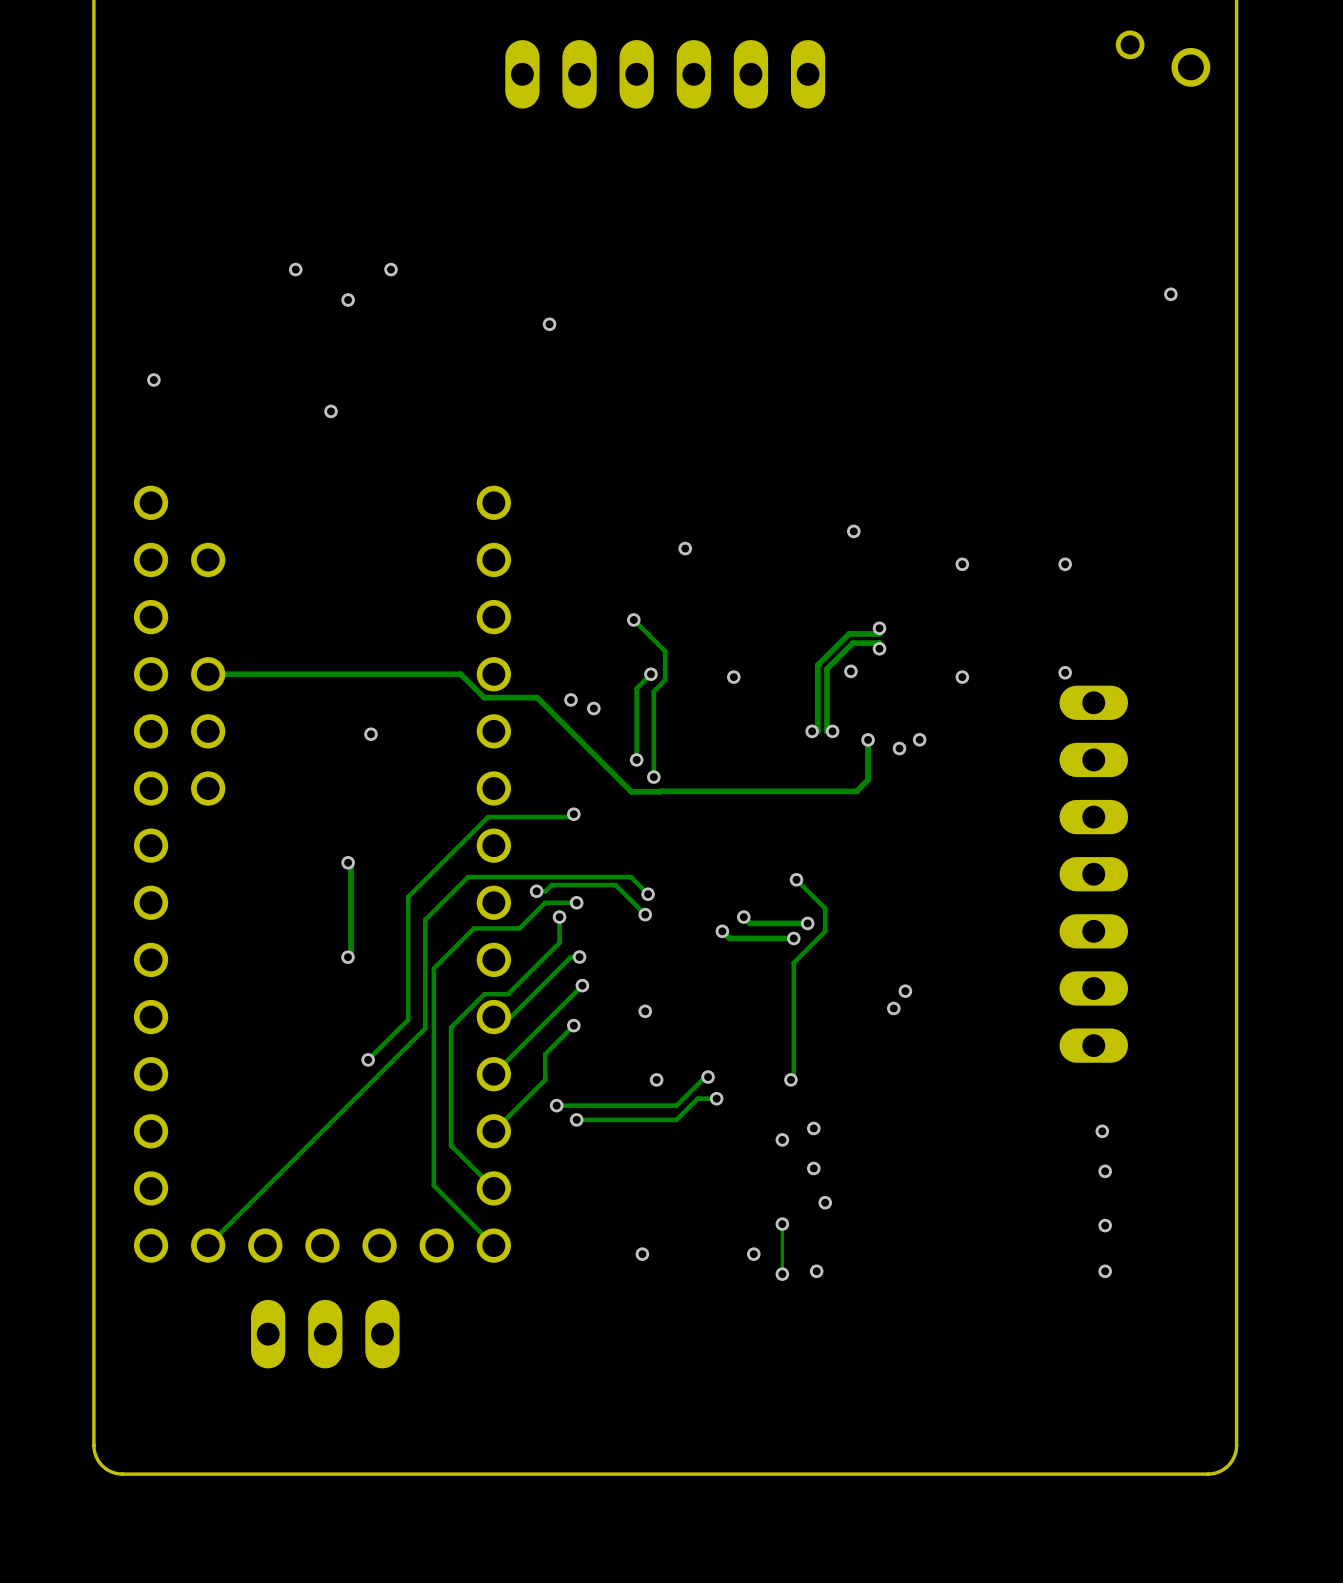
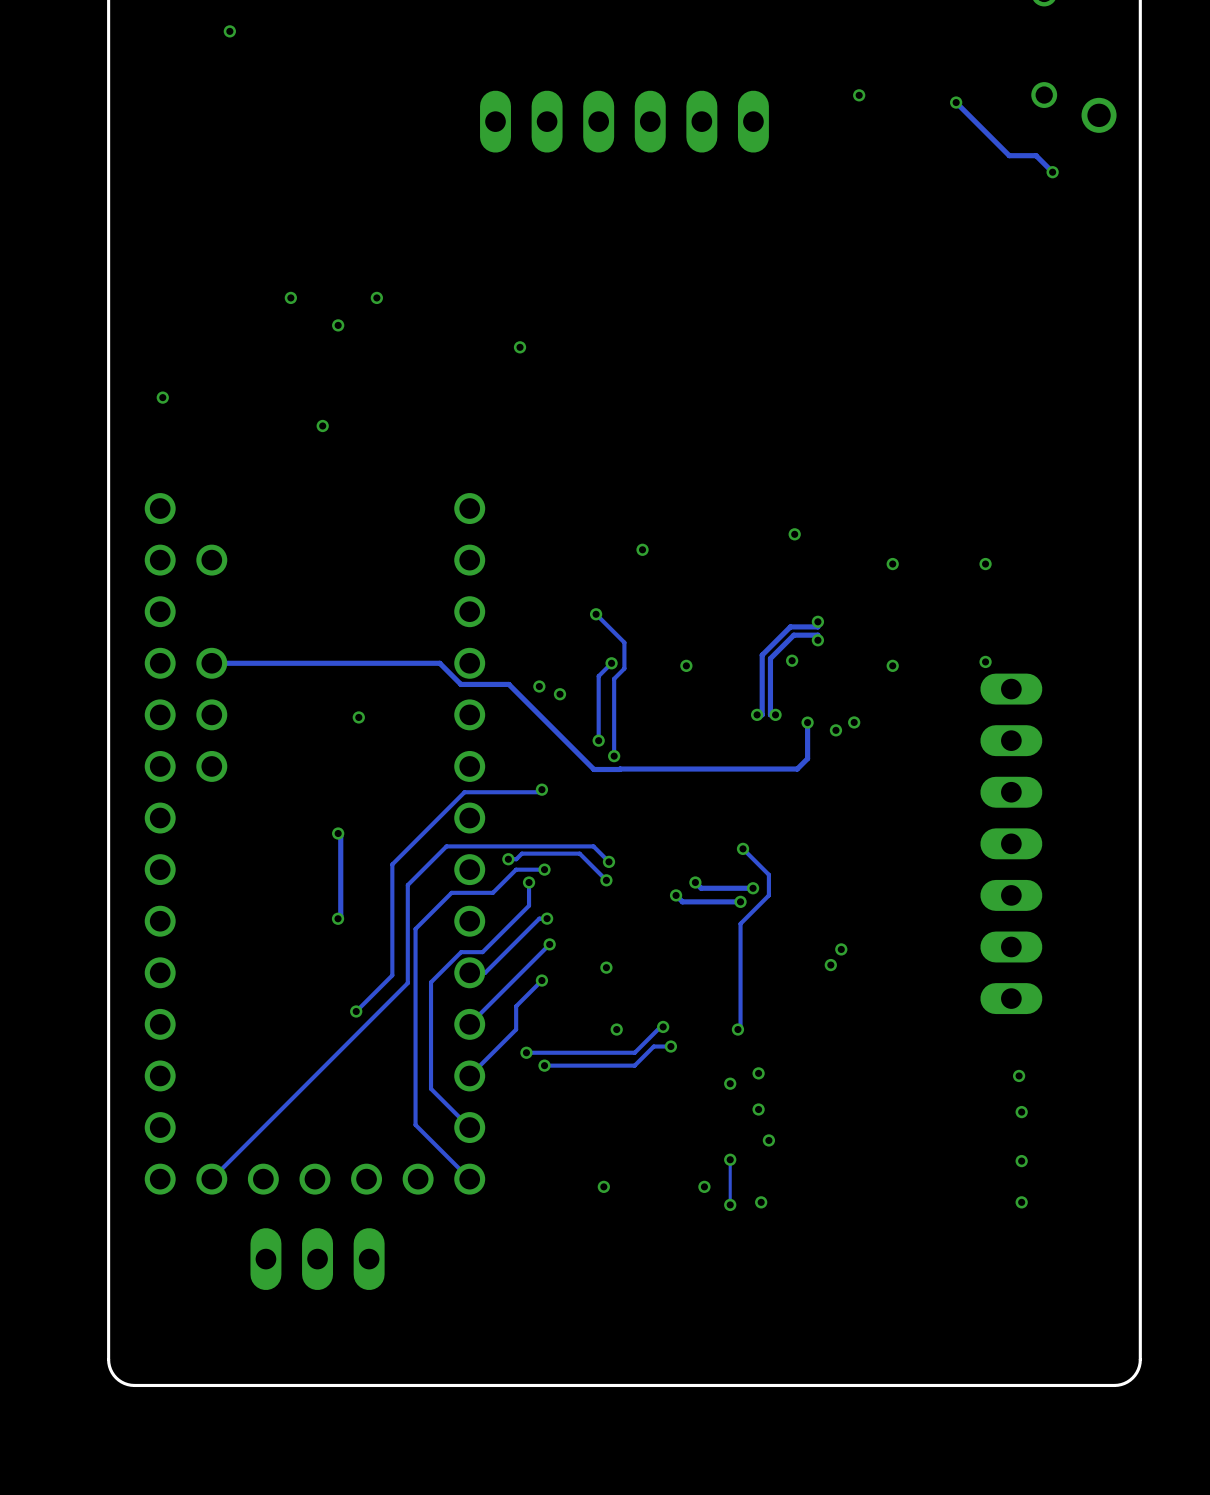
via: none -> (859, 95)
track: none -> (956, 102) (1009, 155) (1036, 155) (1052, 172)
via: none -> (956, 102)
via: none -> (1052, 172)
via: (1170, 294) -> none

